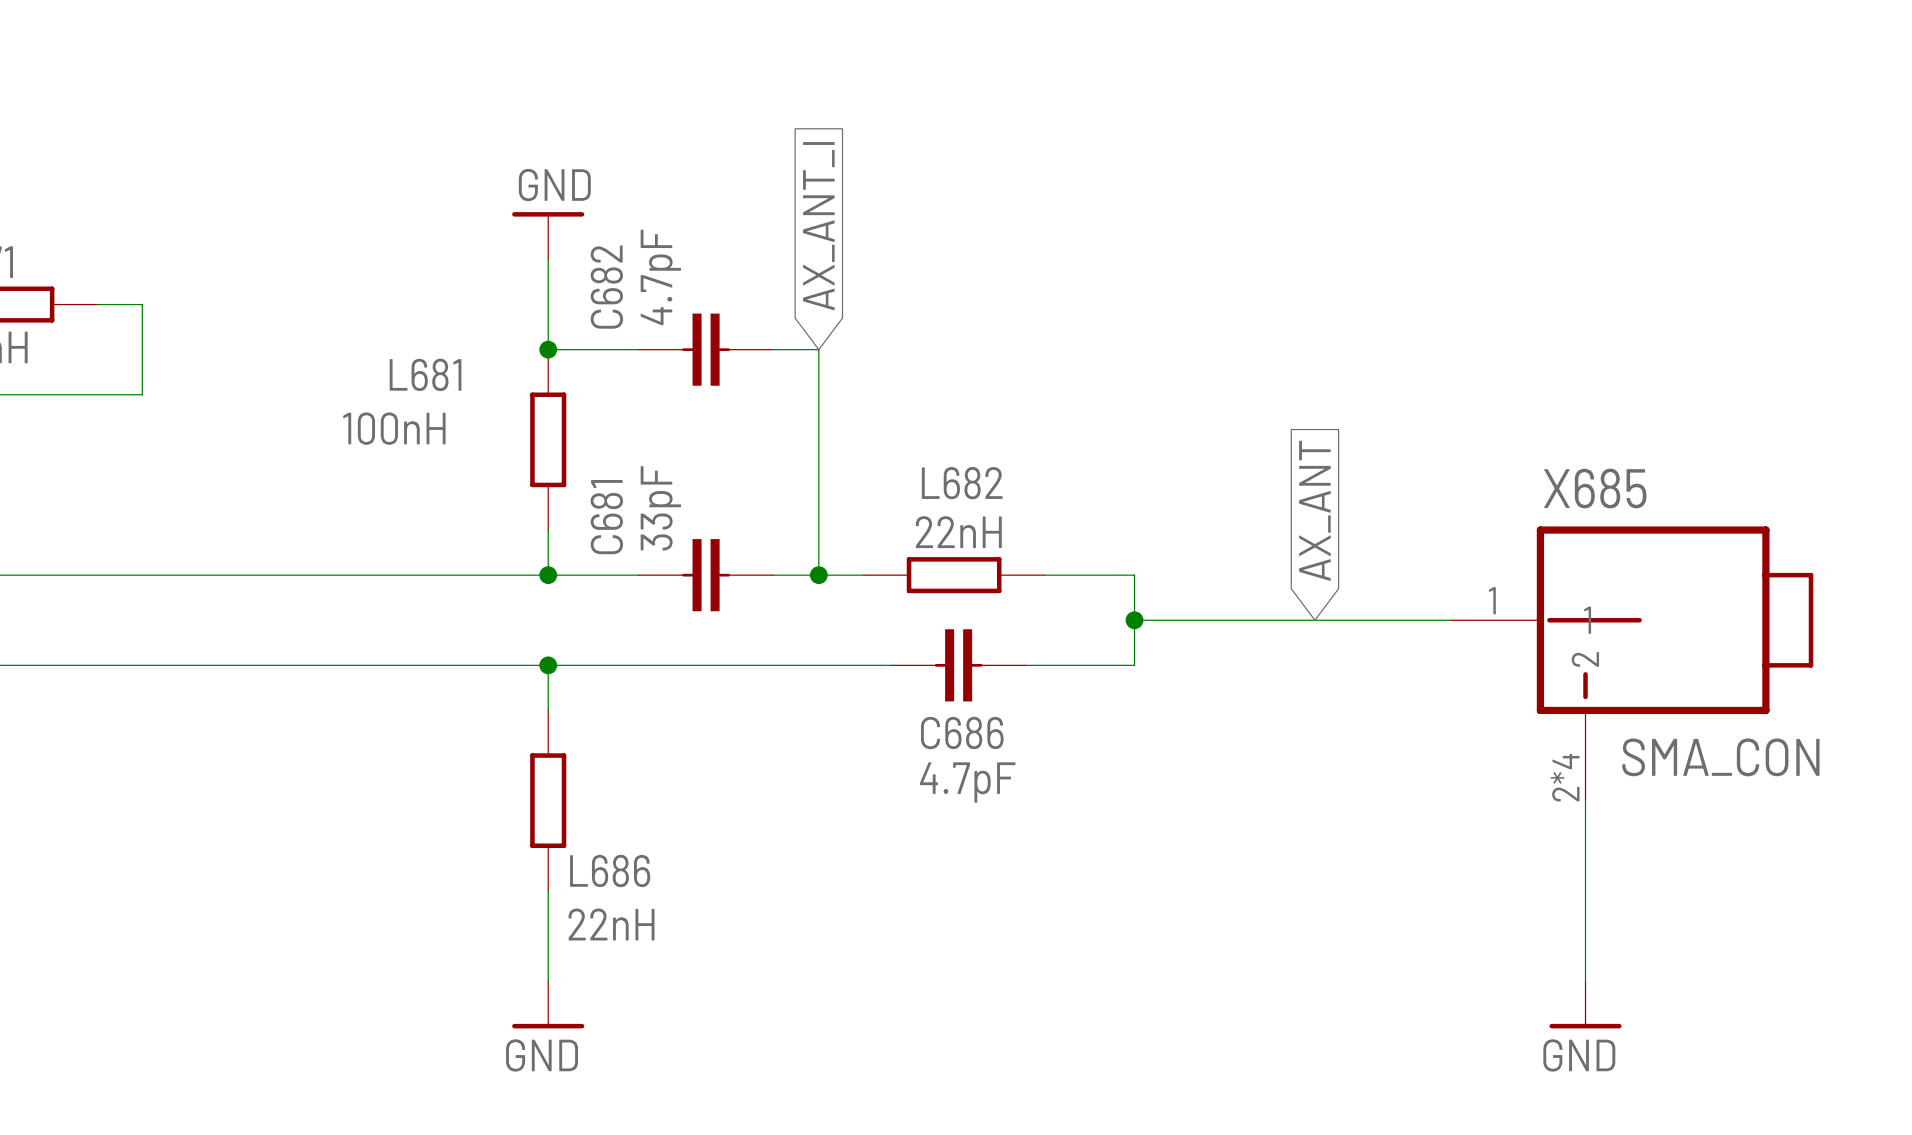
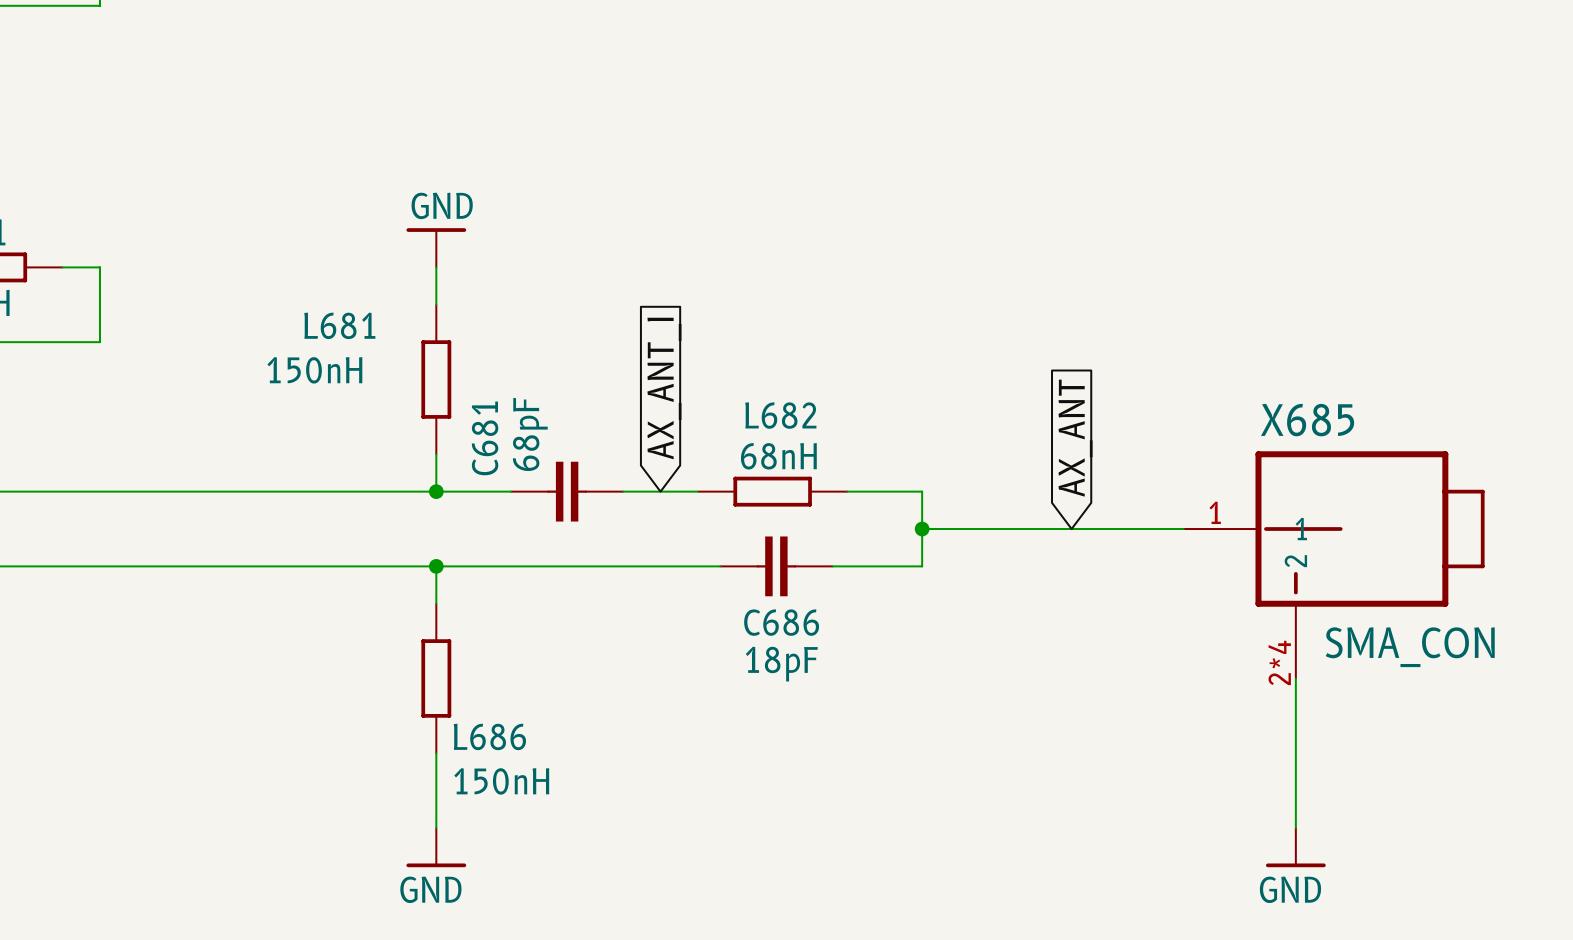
global label position: AX_ANT_I (818, 226) -> AX_ANT_I (664, 388)
power symbol position: GND (548, 235) -> GND (436, 247)
wire: (548, 349) (638, 349) -> none
junction: (548, 349) -> none
C682: 4.7pF (706, 349) -> none
wire: (773, 349) (818, 349) (818, 575) -> none
L681 value: 100nH (394, 428) -> 150nH (314, 370)
C681 value: 33pF (660, 508) -> 68pF (530, 434)
L682 value: 22nH (958, 532) -> 68nH (778, 456)
junction: (818, 575) -> none
C686 value: 4.7pF (967, 782) -> 18pF (781, 664)
L686 value: 22nH (611, 924) -> 150nH (501, 781)

